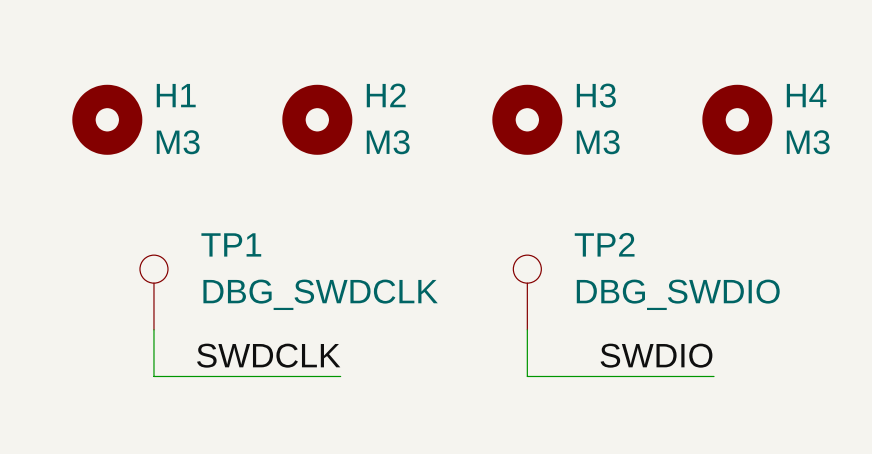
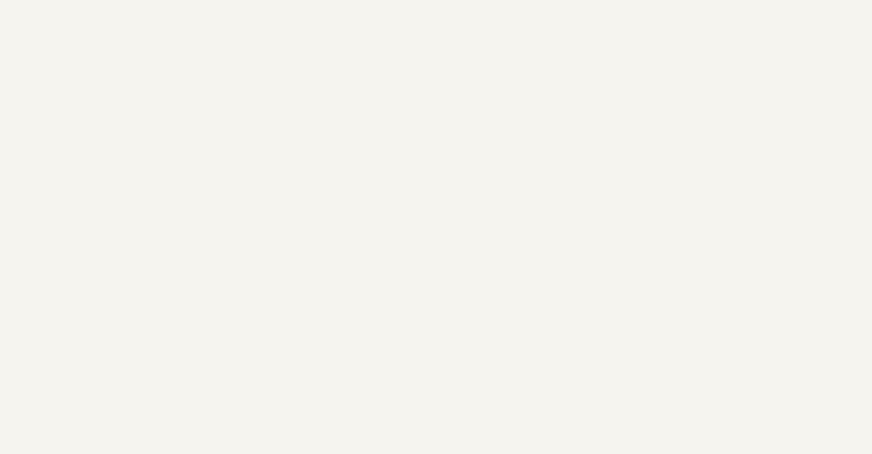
H1: M3 (107, 119) -> none
H2: M3 (317, 119) -> none
H3: M3 (527, 119) -> none
H4: M3 (737, 119) -> none
TP1: DBG_SWDCLK (153, 292) -> none
TP2: DBG_SWDIO (527, 292) -> none
wire: (153, 329) (153, 376) (340, 376) -> none
wire: (527, 329) (527, 376) (714, 376) -> none
label: SWDCLK (268, 355) -> none
label: SWDIO (656, 355) -> none

